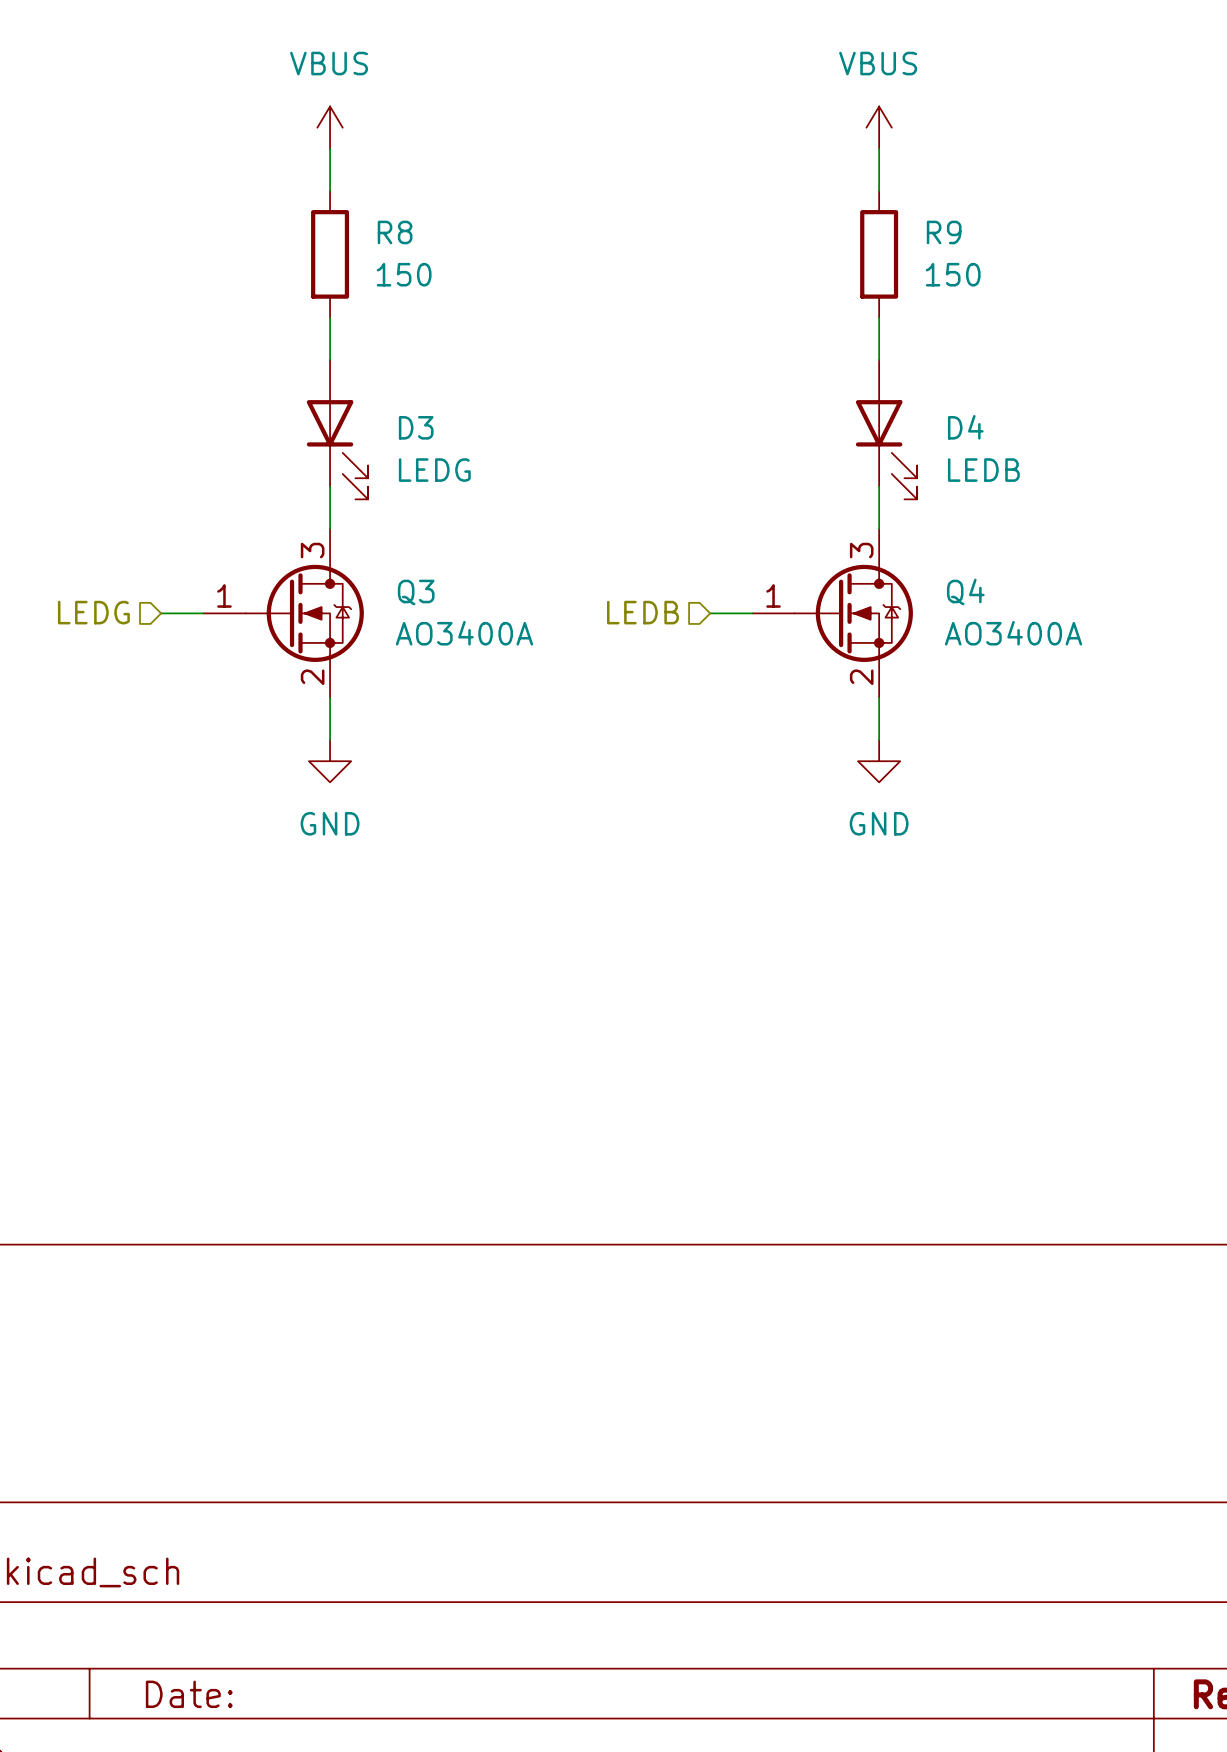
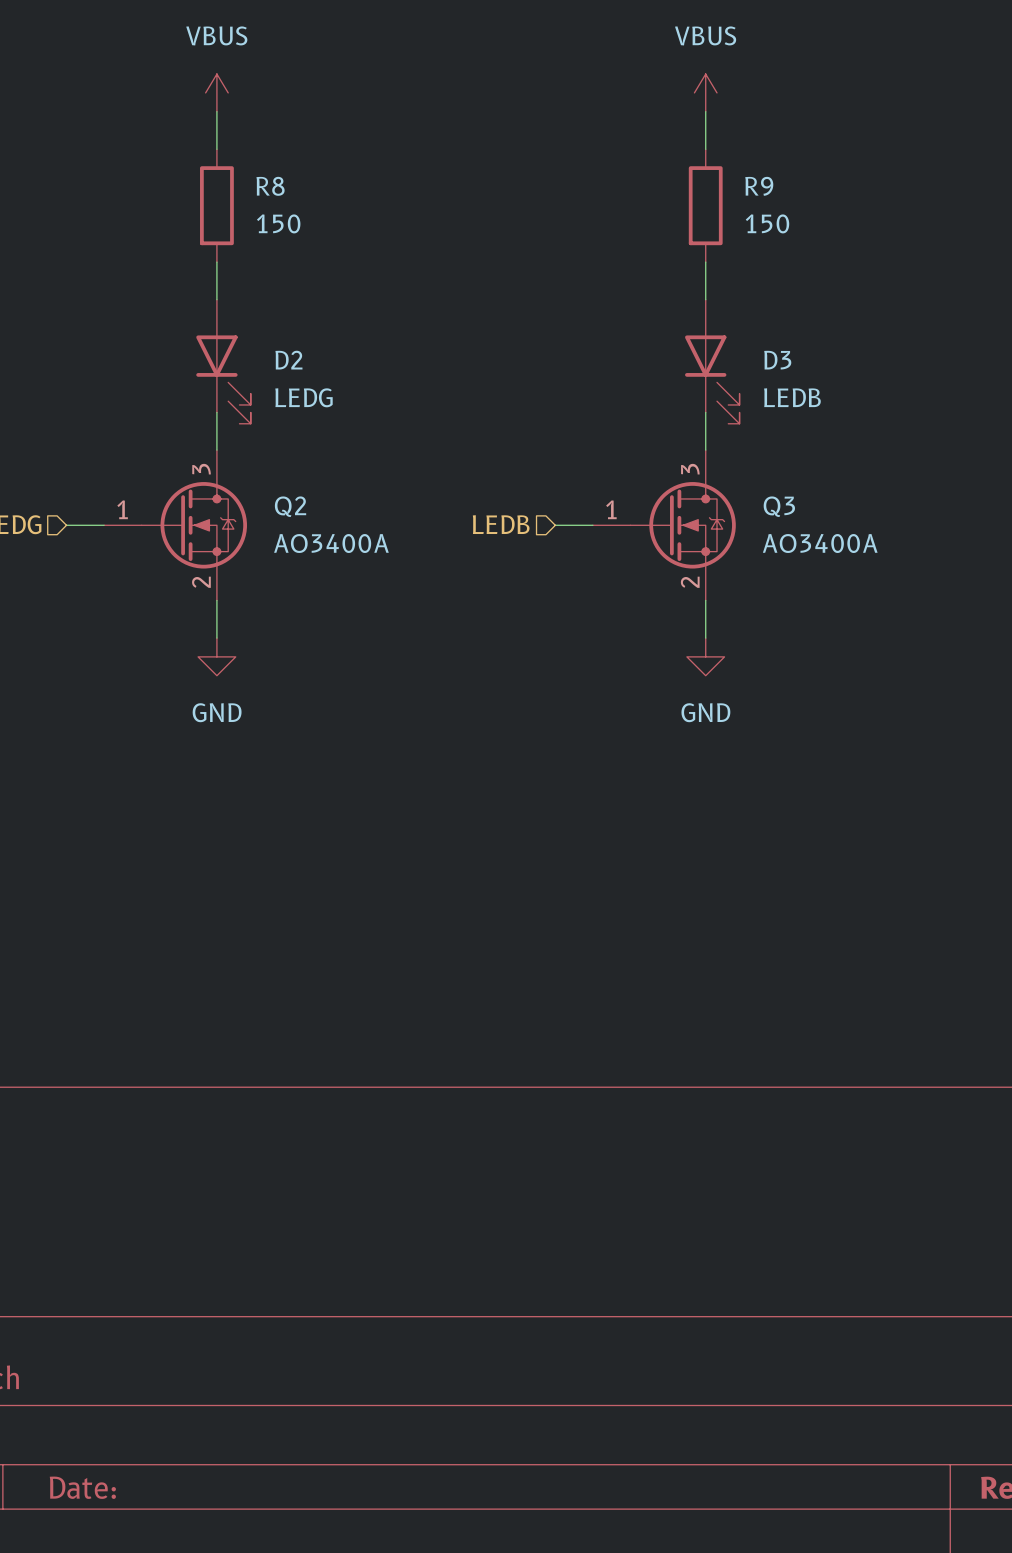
D3 name: D3 (416, 427) -> D2 (288, 360)
D4 name: D4 (965, 427) -> D3 (777, 360)
Q4 name: Q4 (965, 591) -> Q3 (779, 506)
Q3 name: Q3 (416, 592) -> Q2 (290, 506)

